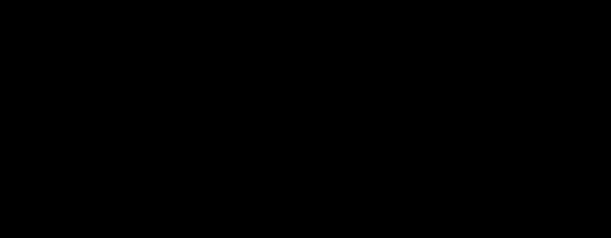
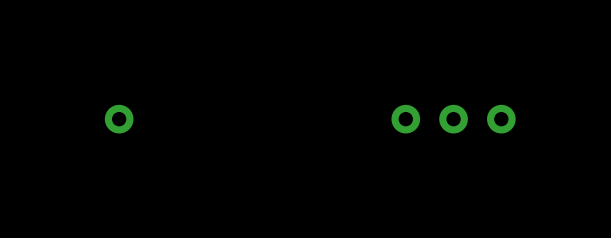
via: none -> (119, 119)
via: none -> (405, 119)
via: none -> (453, 119)
via: none -> (501, 119)

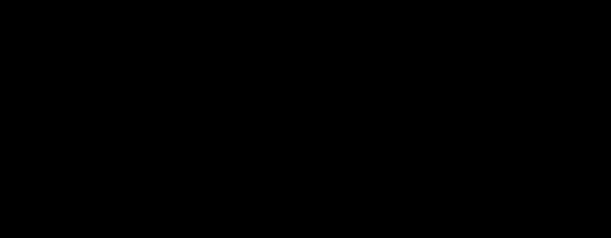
via: (119, 119) -> none
via: (405, 119) -> none
via: (453, 119) -> none
via: (501, 119) -> none

